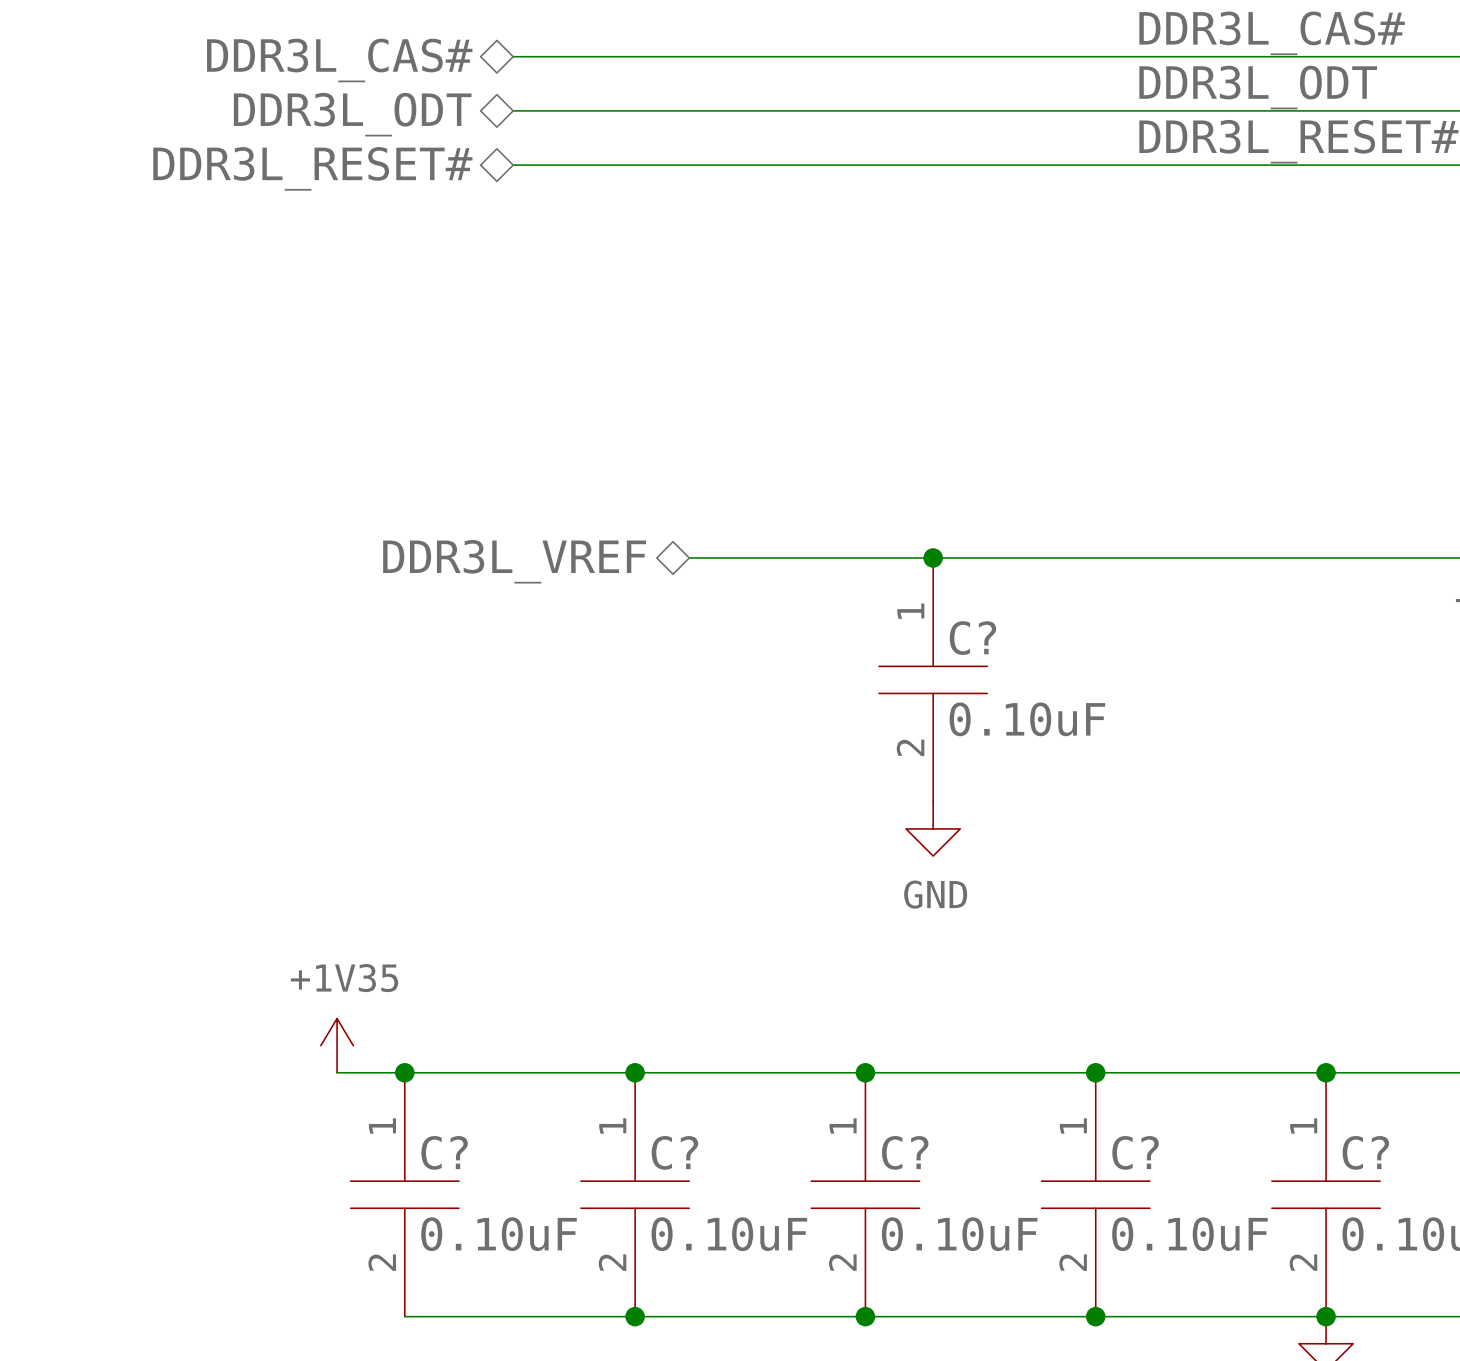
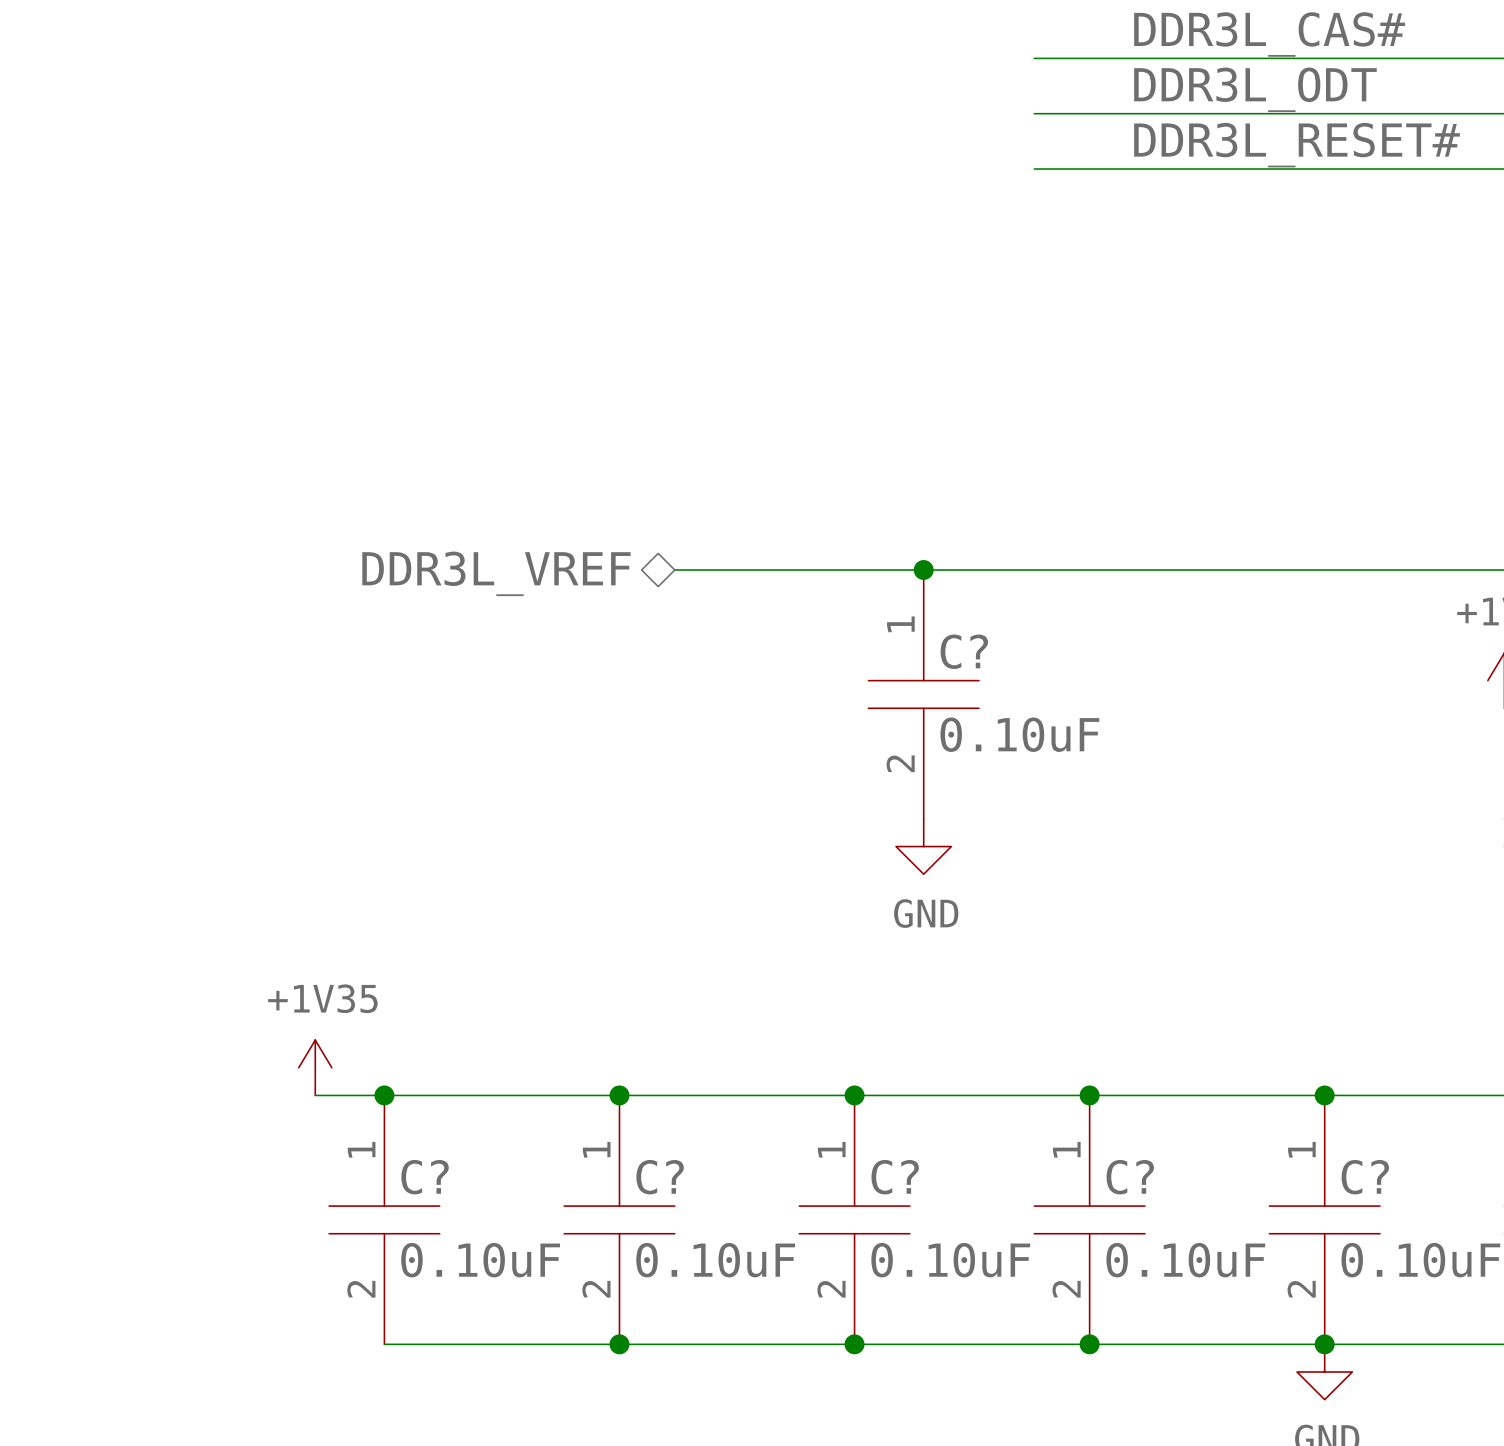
wire: (513, 56) (1041, 56) -> none
hierarchical label: DDR3L_CAS# (339, 60) -> none
wire: (513, 110) (1041, 110) -> none
hierarchical label: DDR3L_ODT (352, 114) -> none
wire: (513, 165) (1041, 165) -> none
hierarchical label: DDR3L_RESET# (312, 168) -> none

